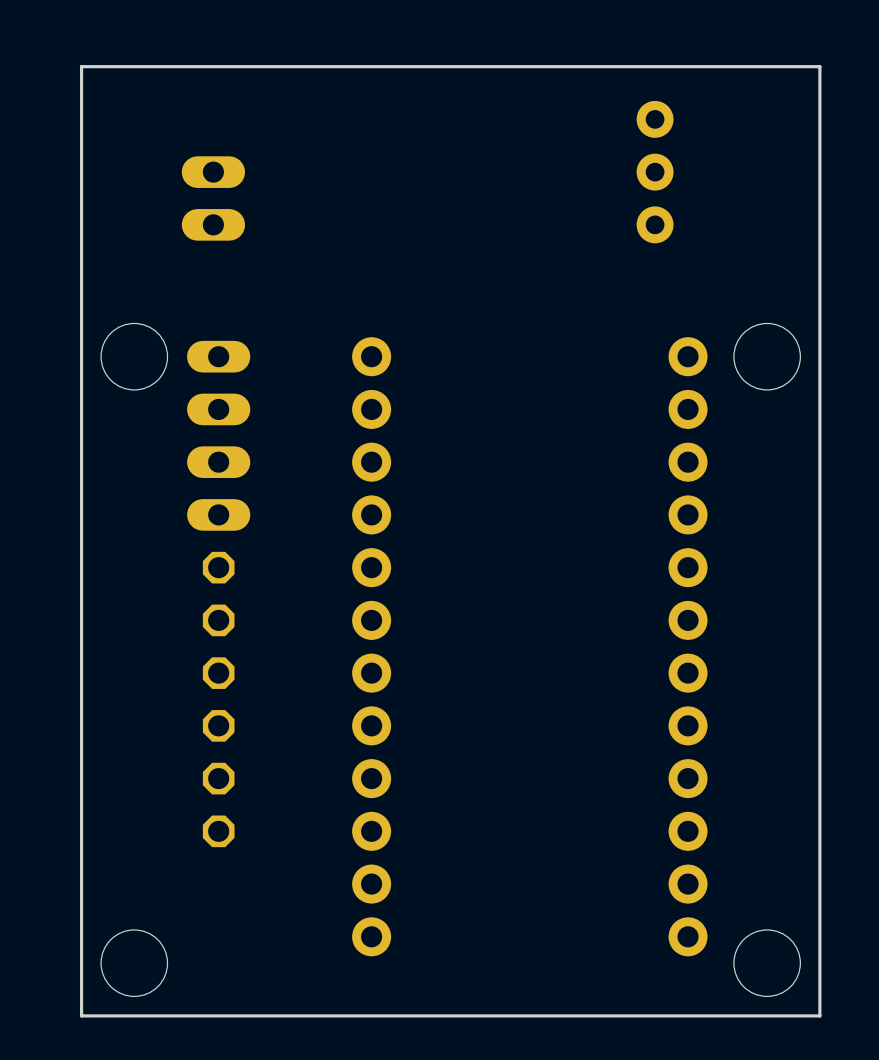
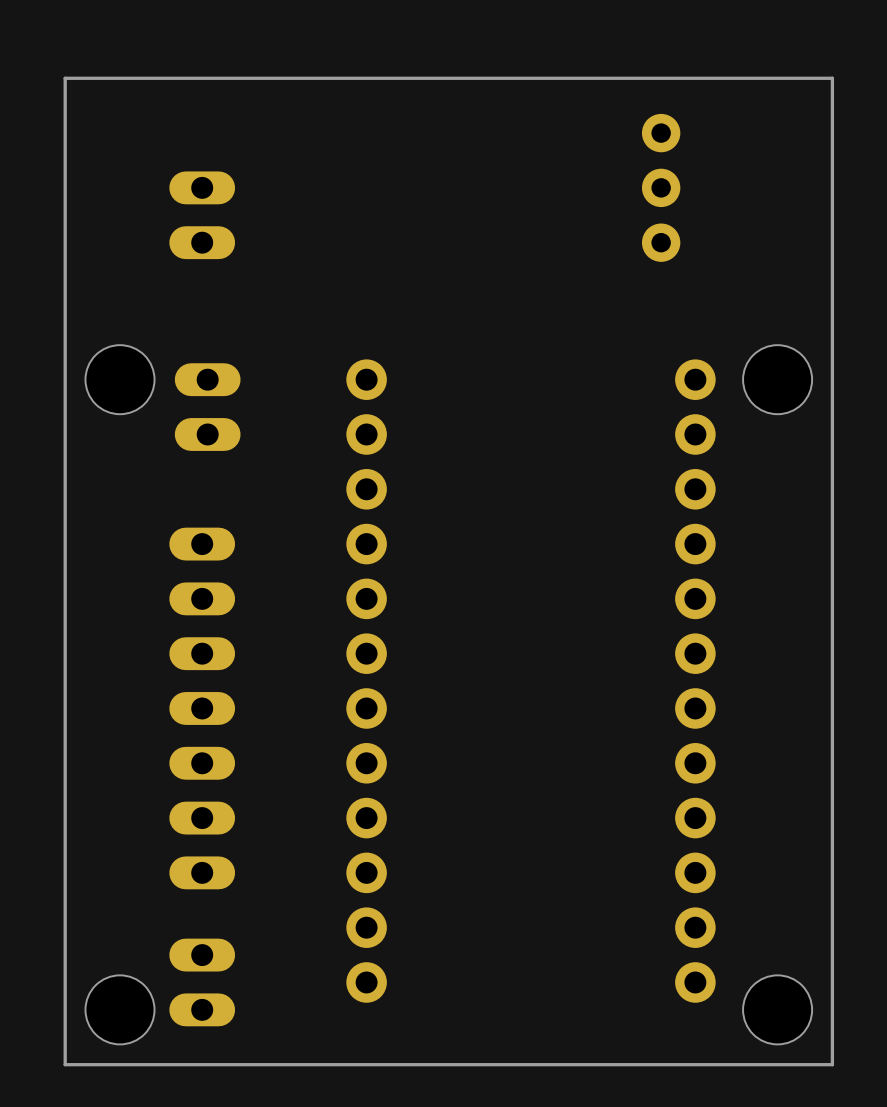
part position: (218, 488) -> (202, 982)
part: none -> (202, 708)
part: (218, 699) -> none

